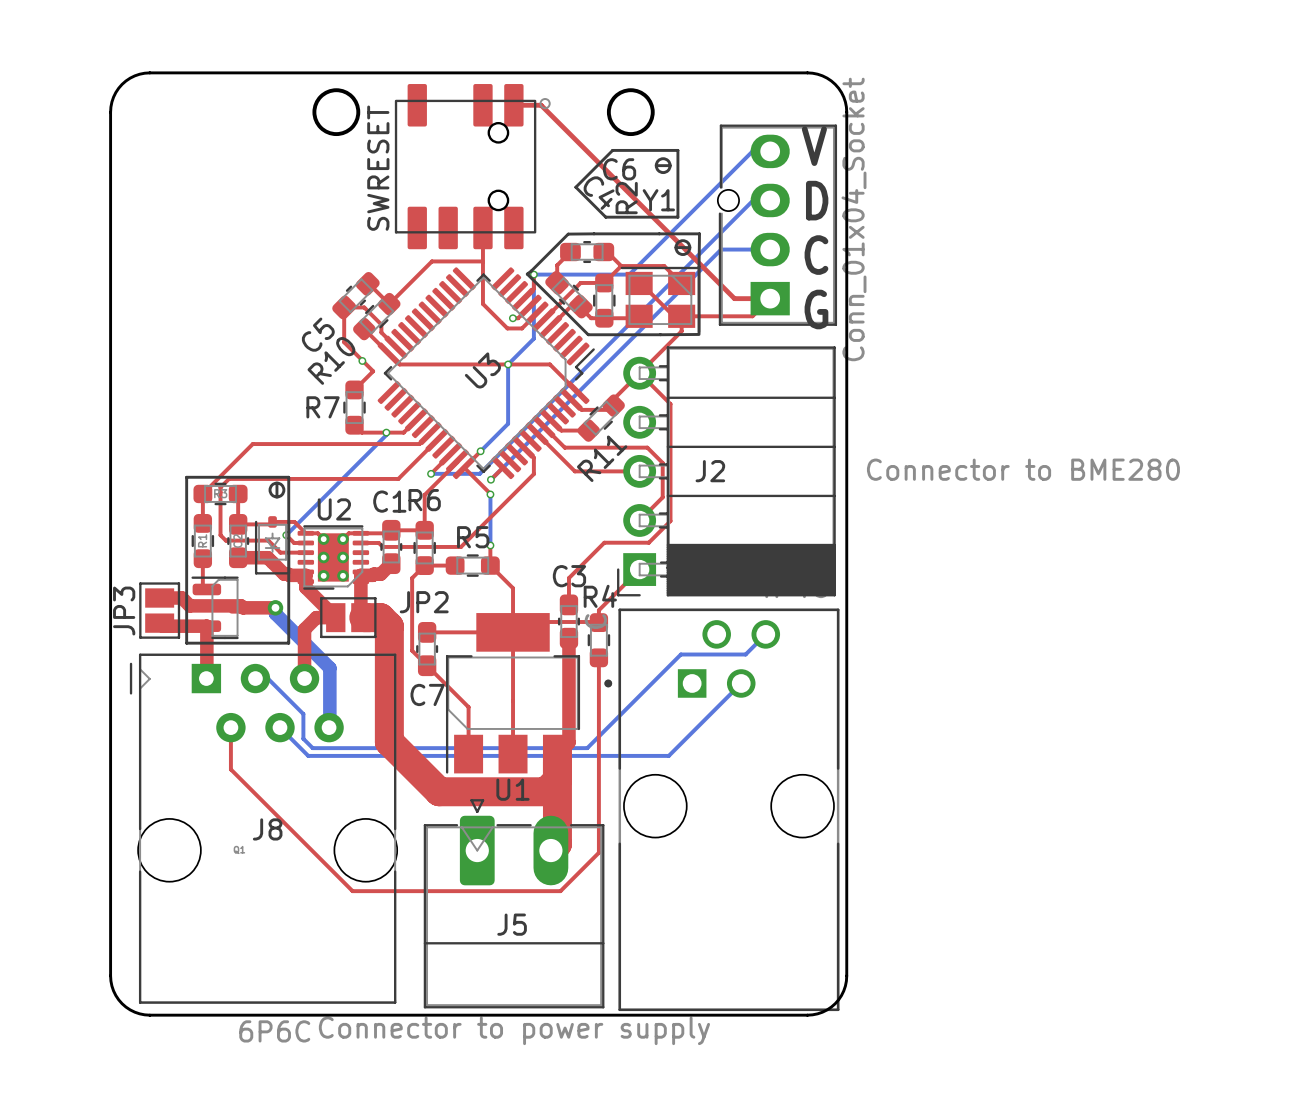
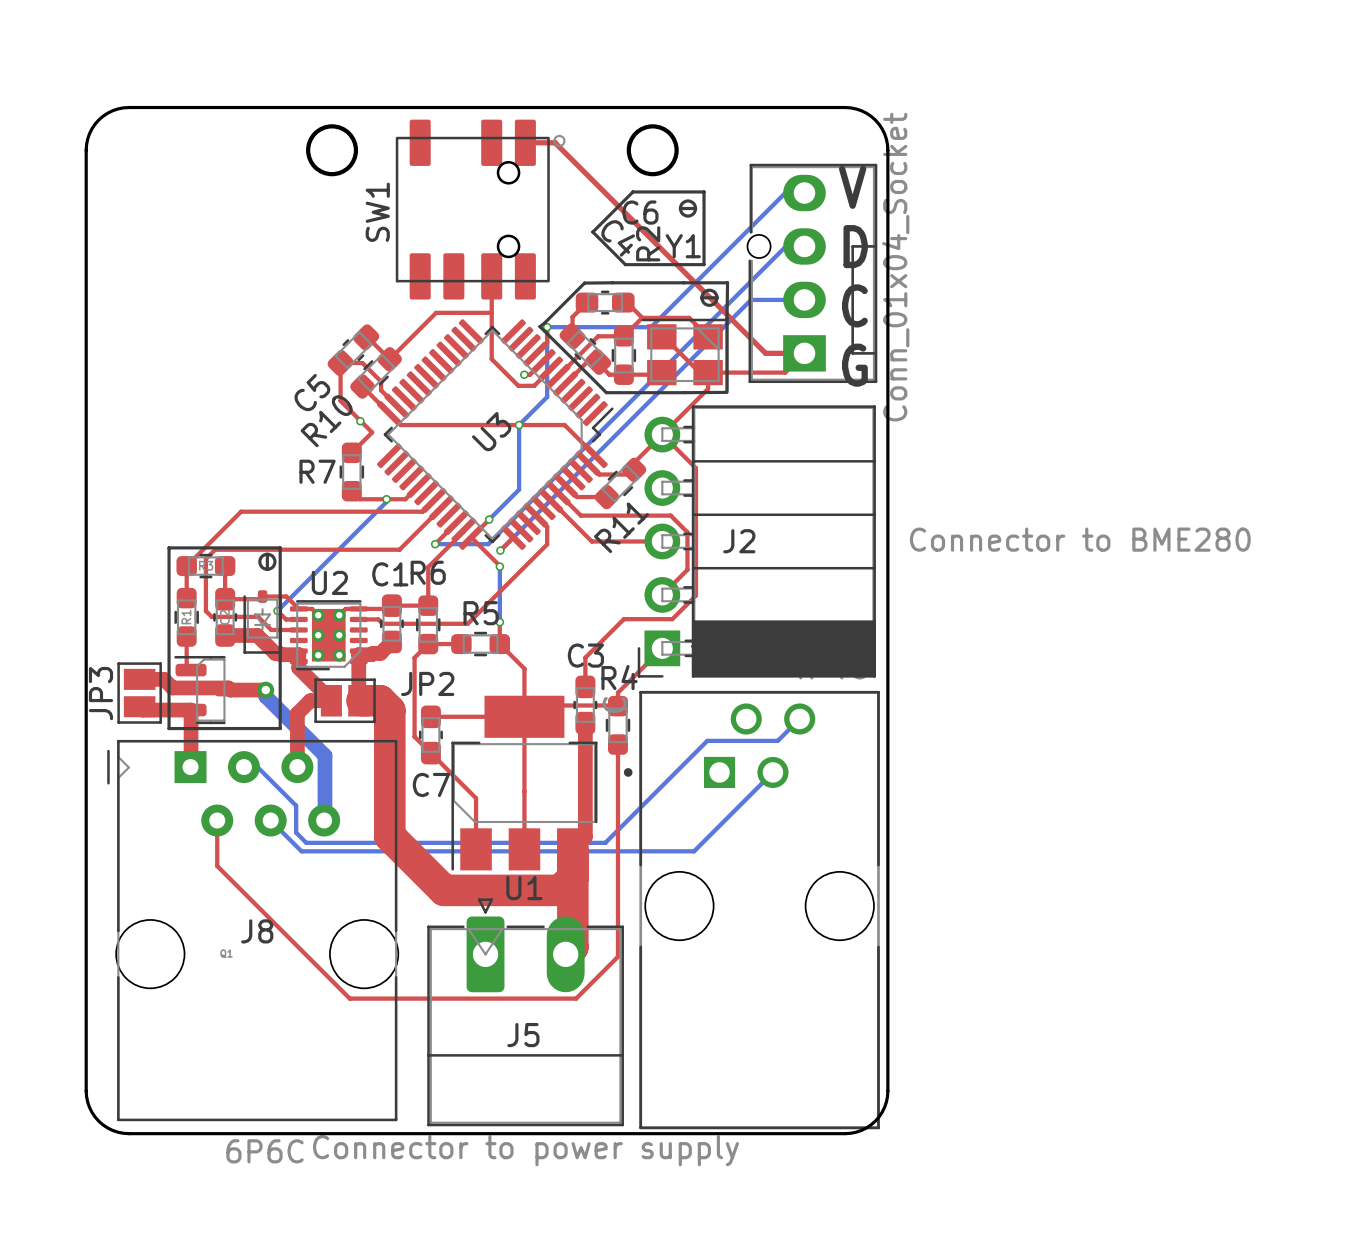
part footprint: [717, 124, 838, 326] -> [747, 163, 878, 384]
SWRESET name: SWRESET (378, 168) -> SW1 (377, 212)

